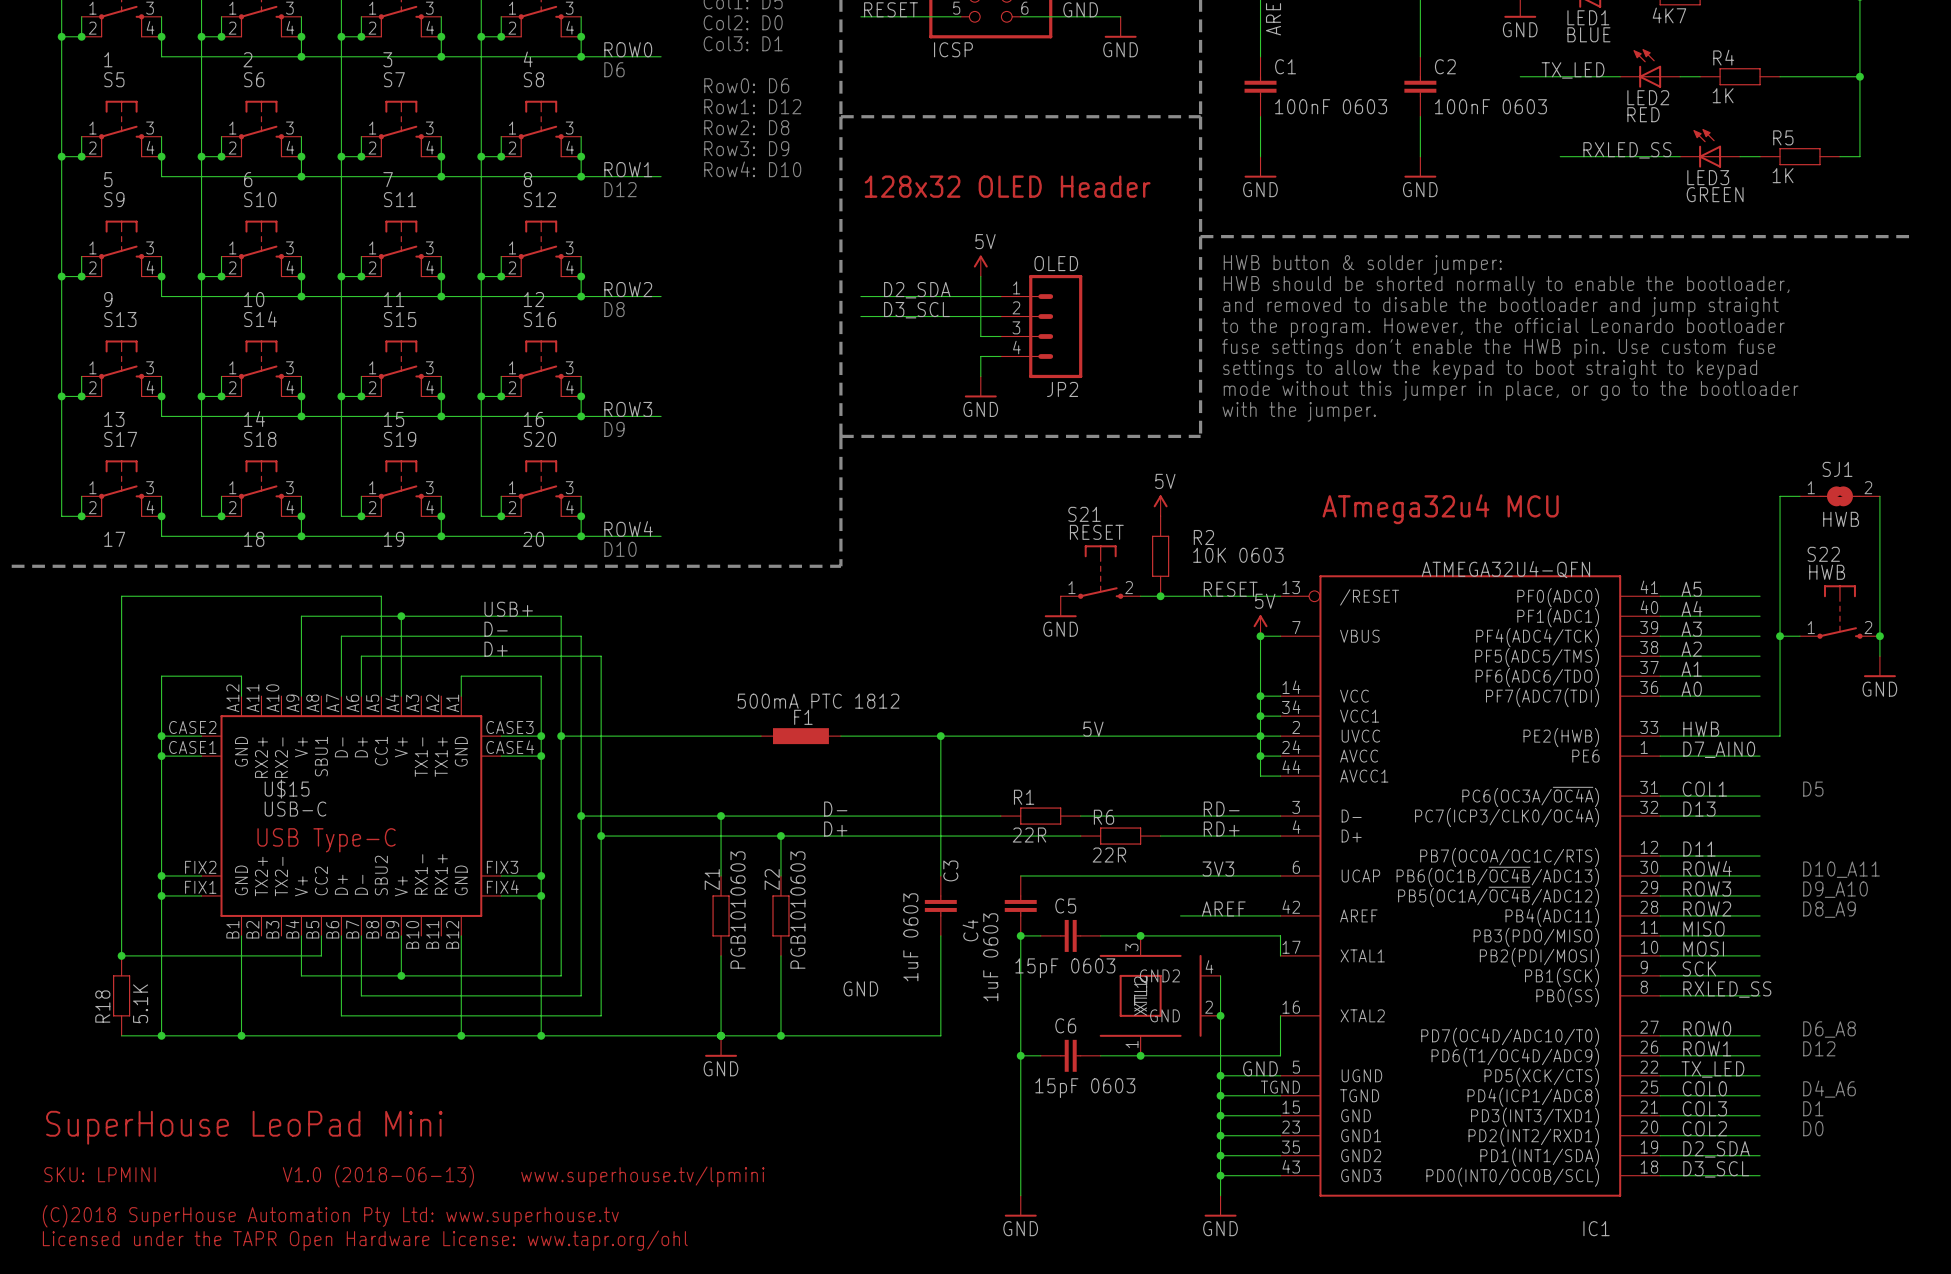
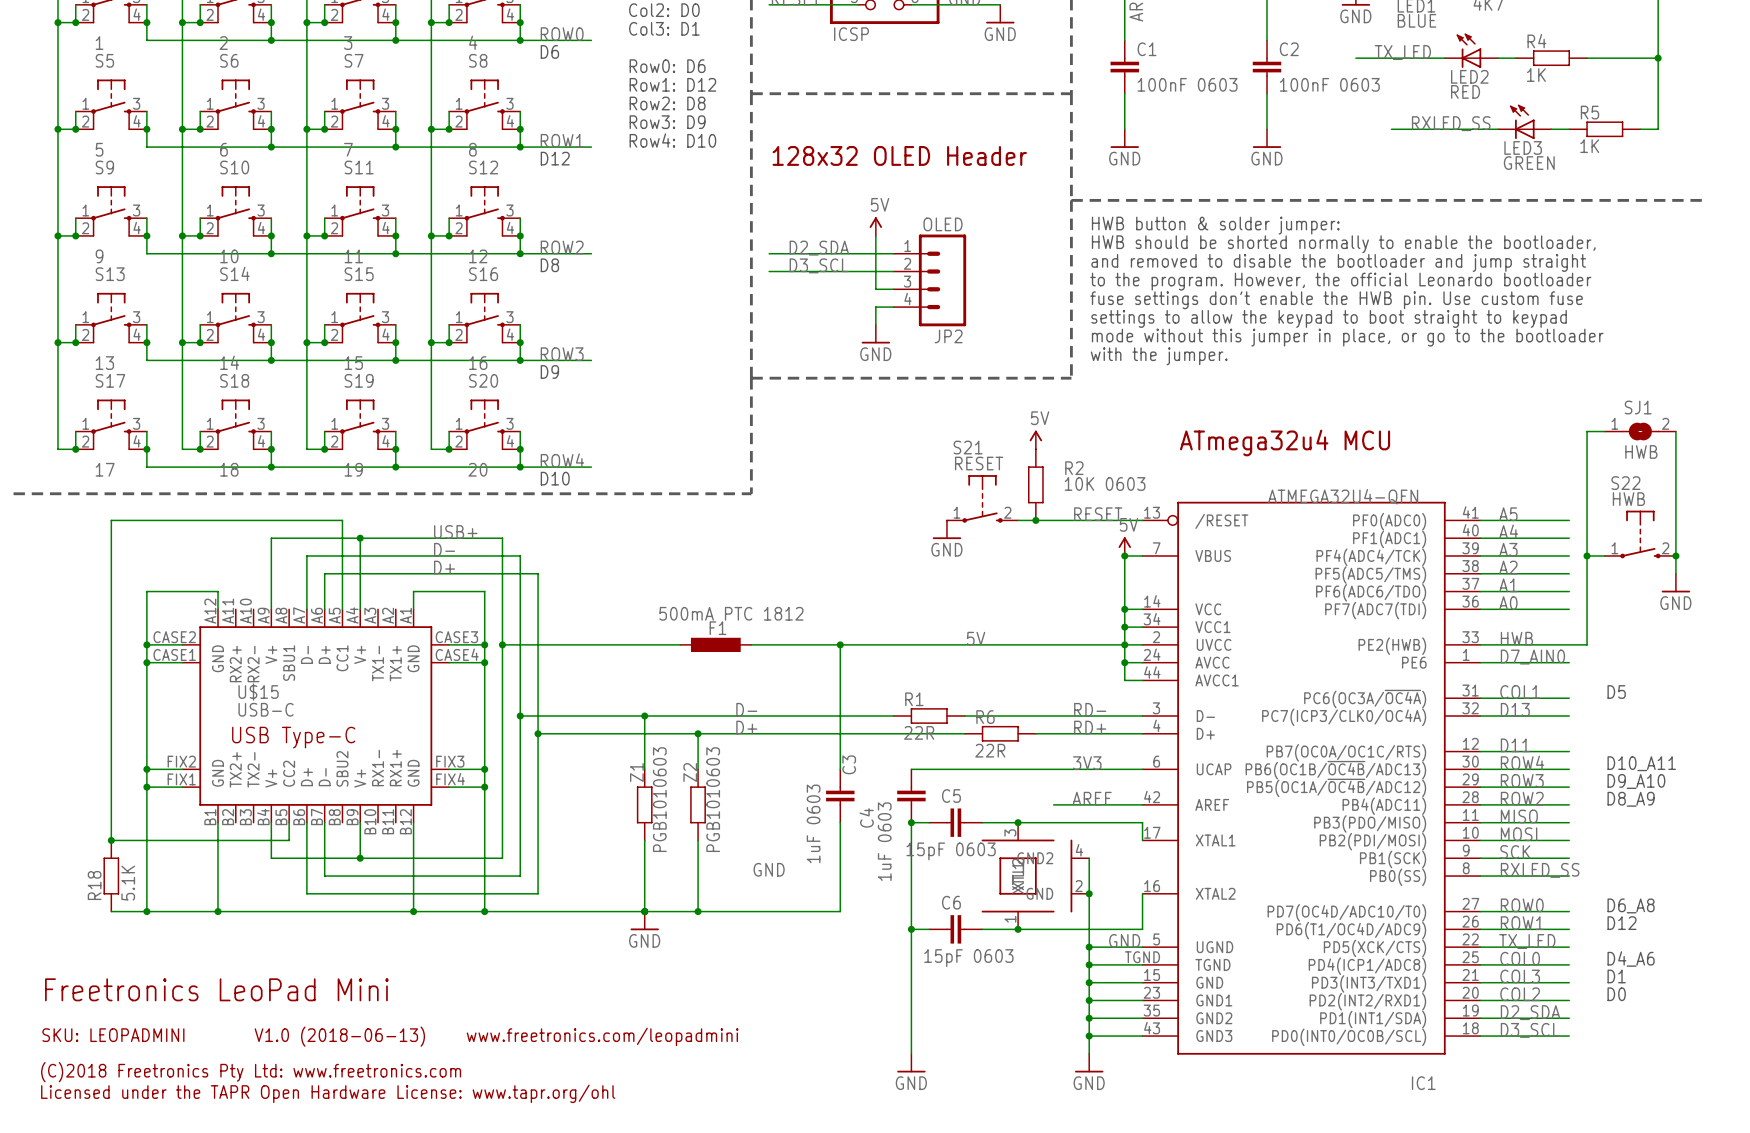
text: SuperHouse LeoPad Mini (244, 1127) -> Freetronics LeoPad Mini (216, 989)
text: SKU: LPMINI (99, 1174) -> SKU: LEOPADMINI (113, 1035)
text: www.superhouse.tv/lpmini (642, 1176) -> www.freetronics.com/leopadmini (602, 1036)
text: (C)2018 SuperHouse Automation Pty Ltd: www.superhouse.tv (330, 1216) -> (C)2018 Freetronics Pty Ltd: www.freetronics.com (251, 1072)

